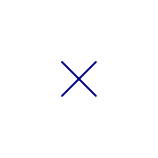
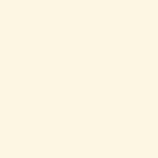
no-connect mark: (78, 78) -> none

